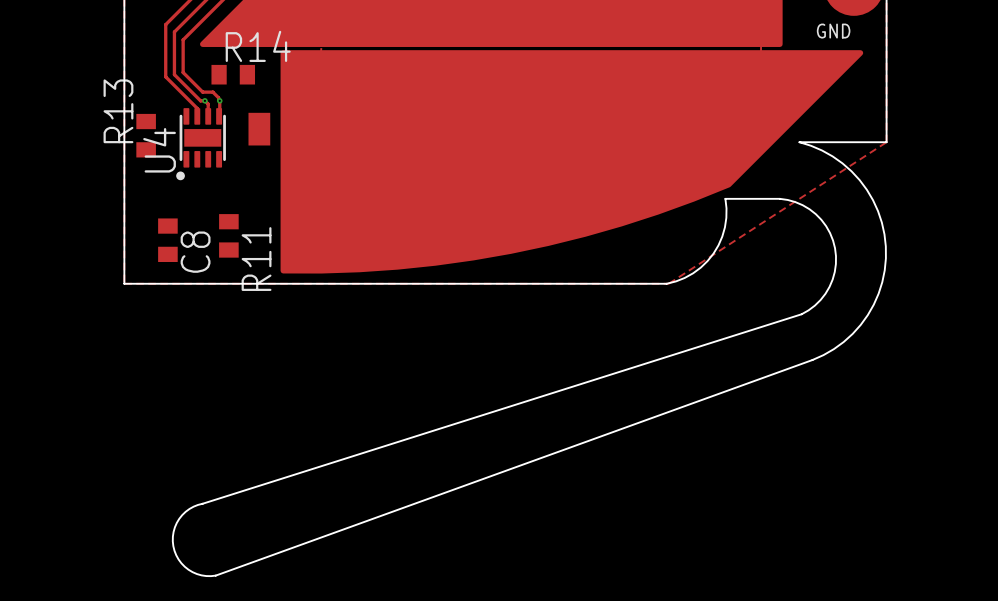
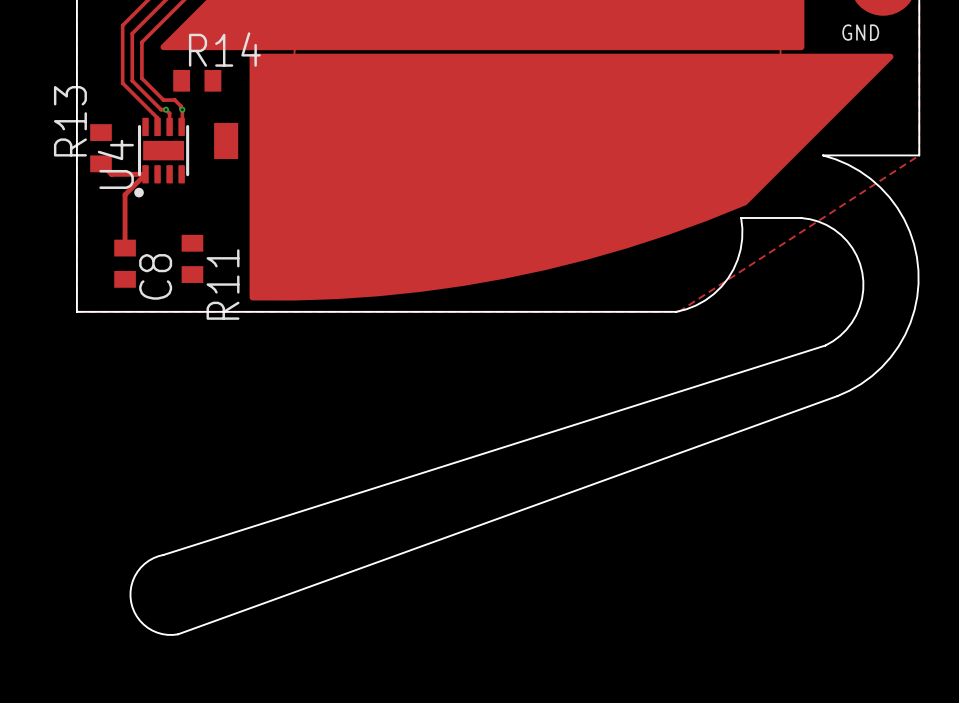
track: none -> (101, 163) (111, 174) (145, 174) (125, 194) (125, 248)

